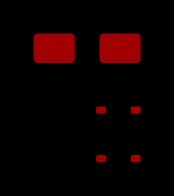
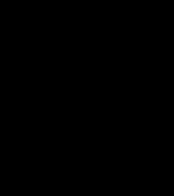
part: (87, 48) -> none
part: (118, 110) -> none
part: (118, 158) -> none

